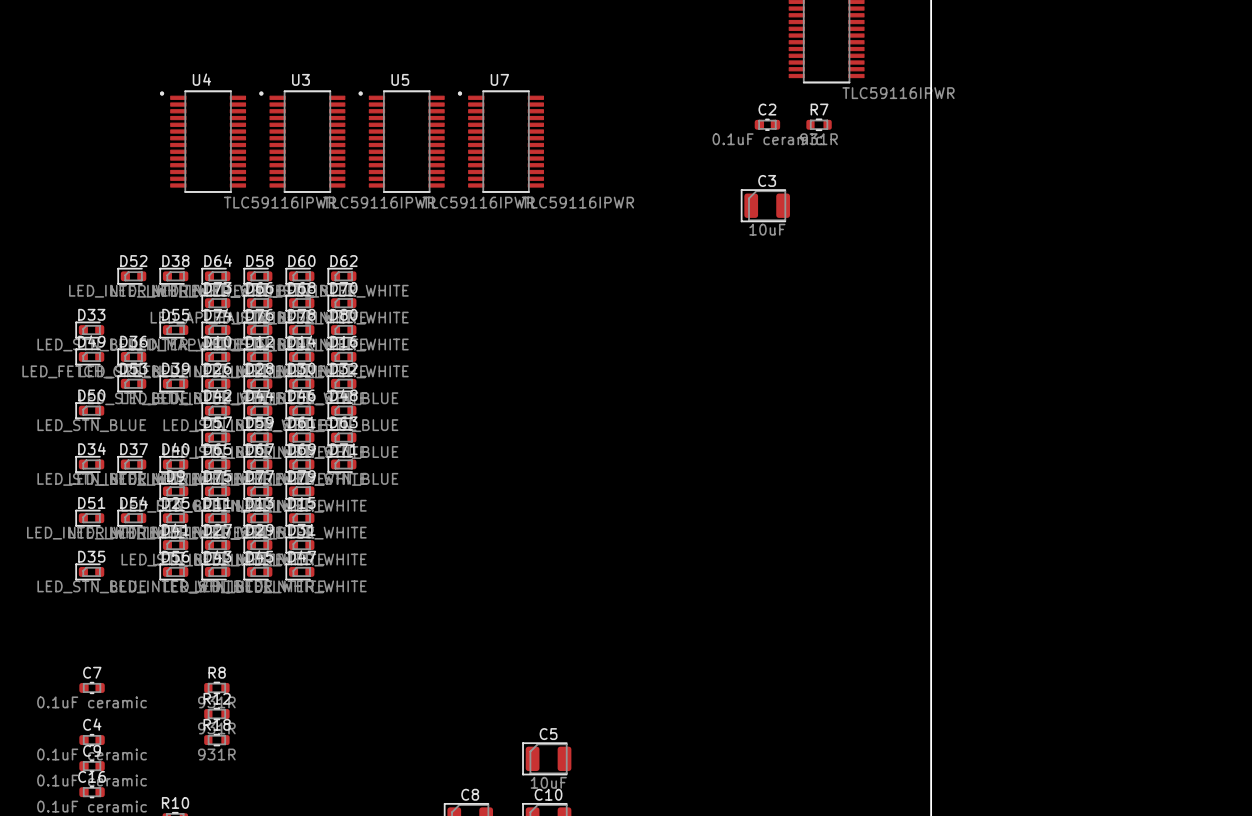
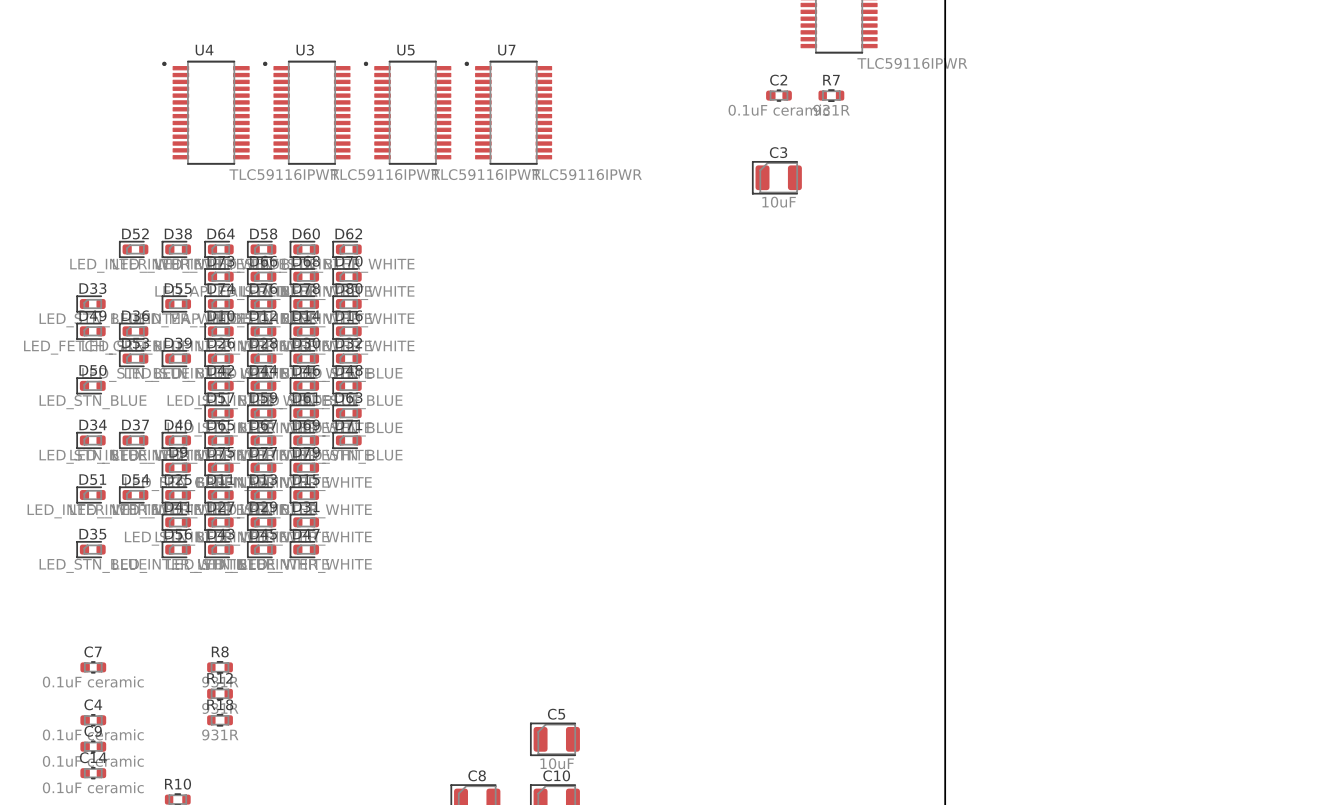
C16 name: C16 (92, 776) -> C14 (93, 757)

